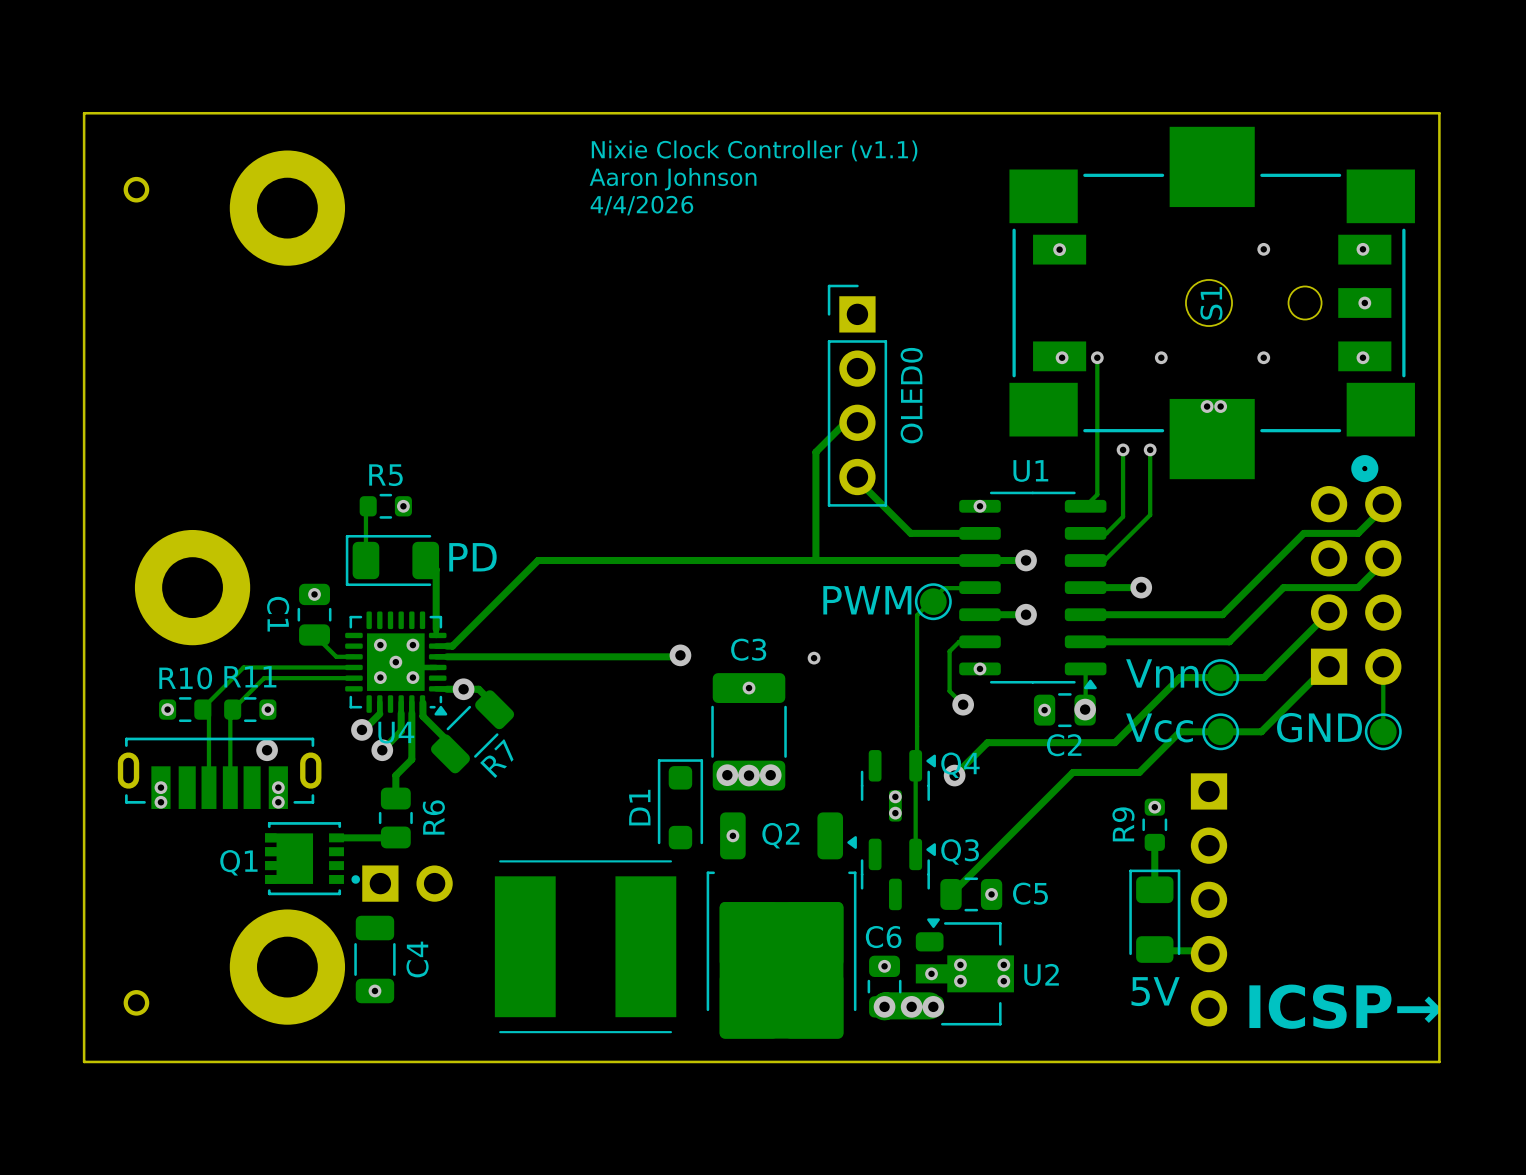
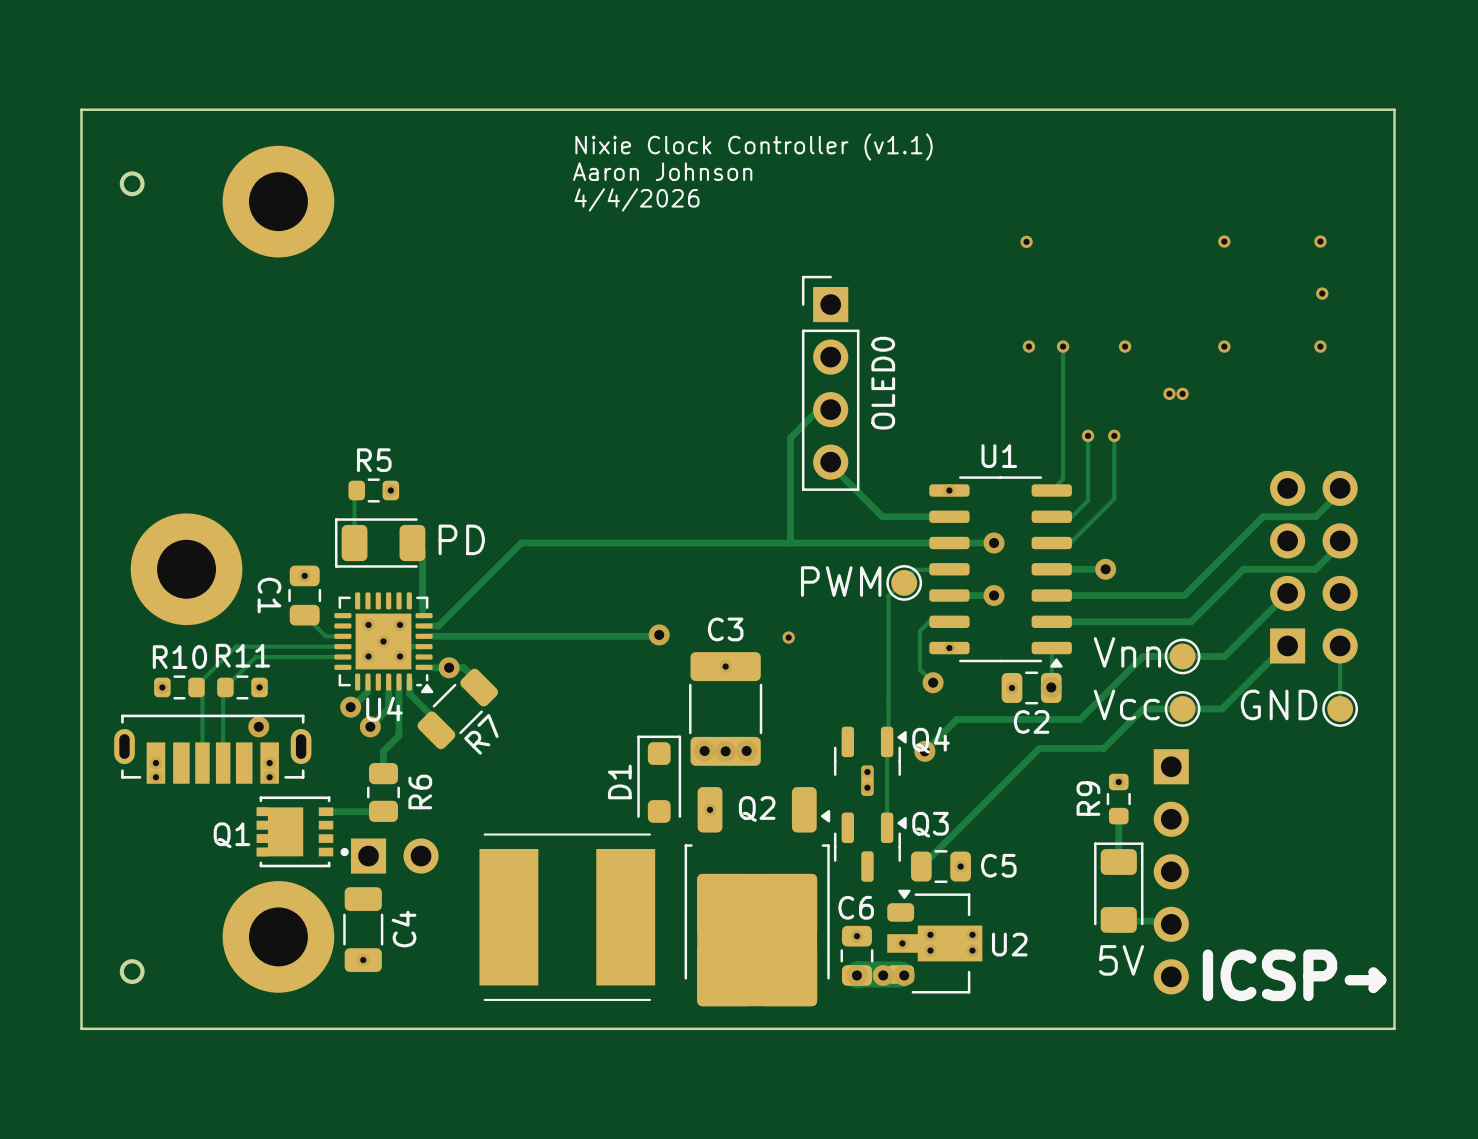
S1: (1212, 304) -> none

